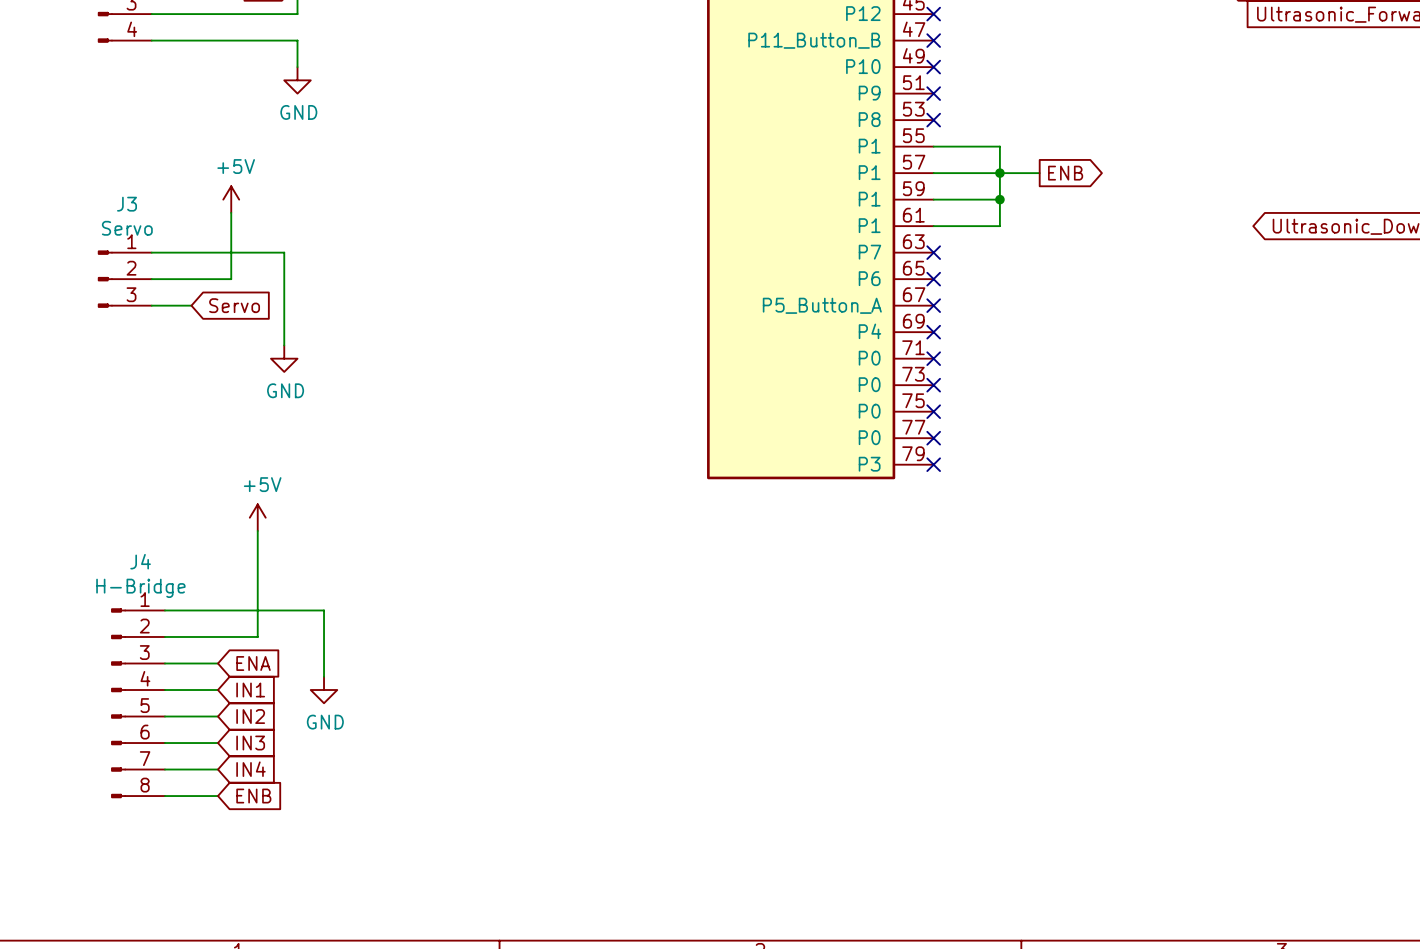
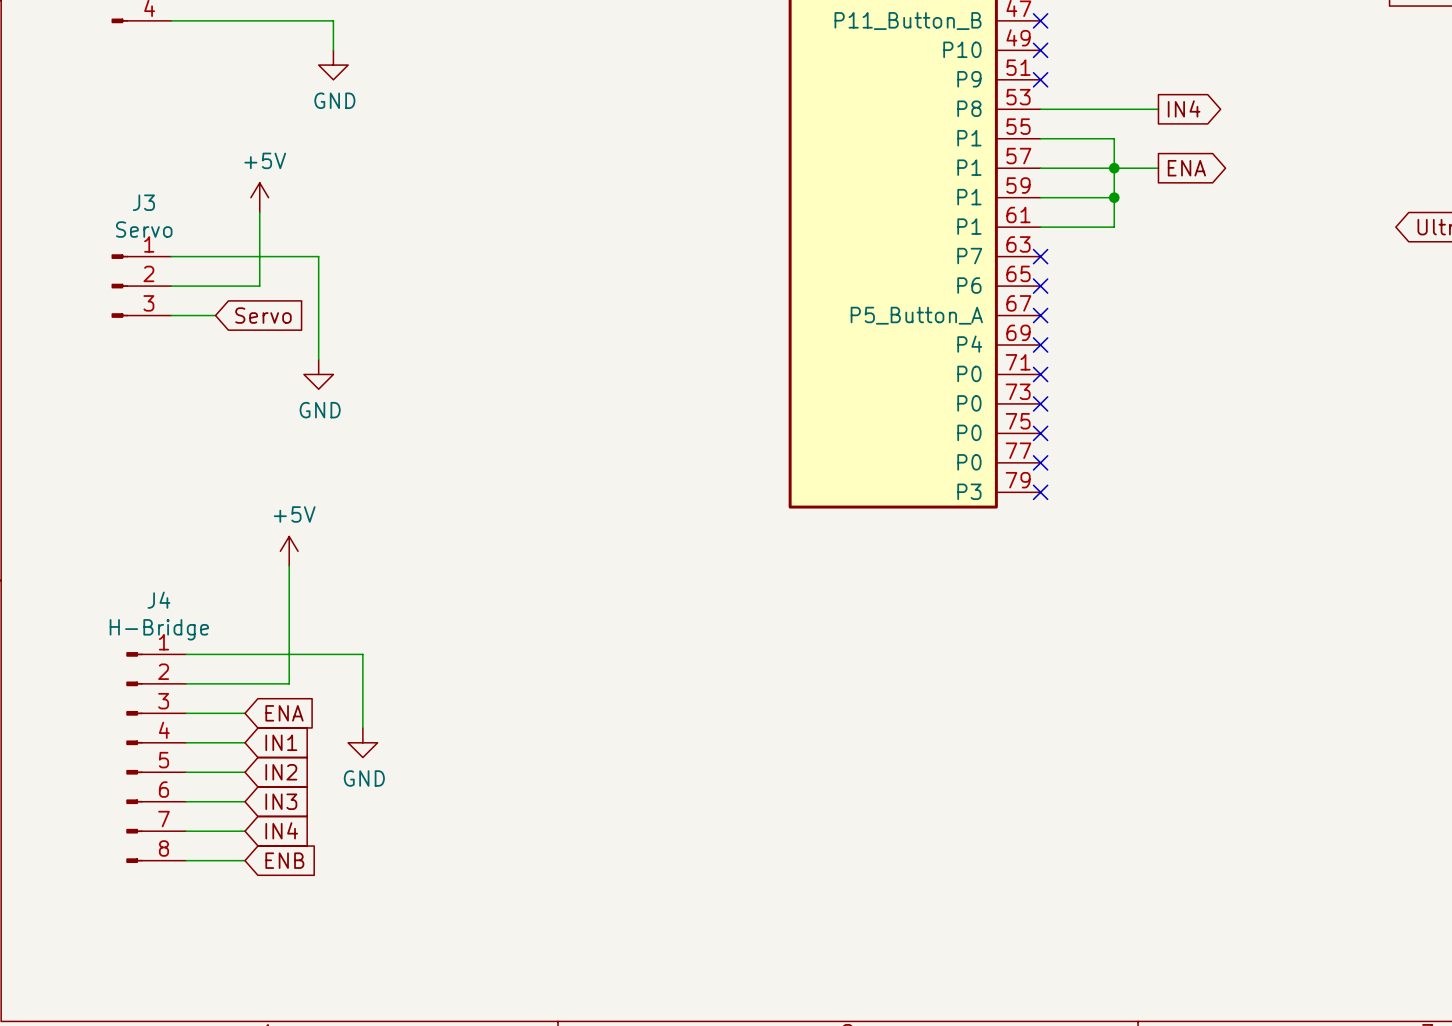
global label: none -> IN4 (1184, 108)
wire: none -> (1040, 109) (1158, 109)
no-connect mark: (933, 120) -> none
global label: ENB (1065, 173) -> ENA (1186, 168)

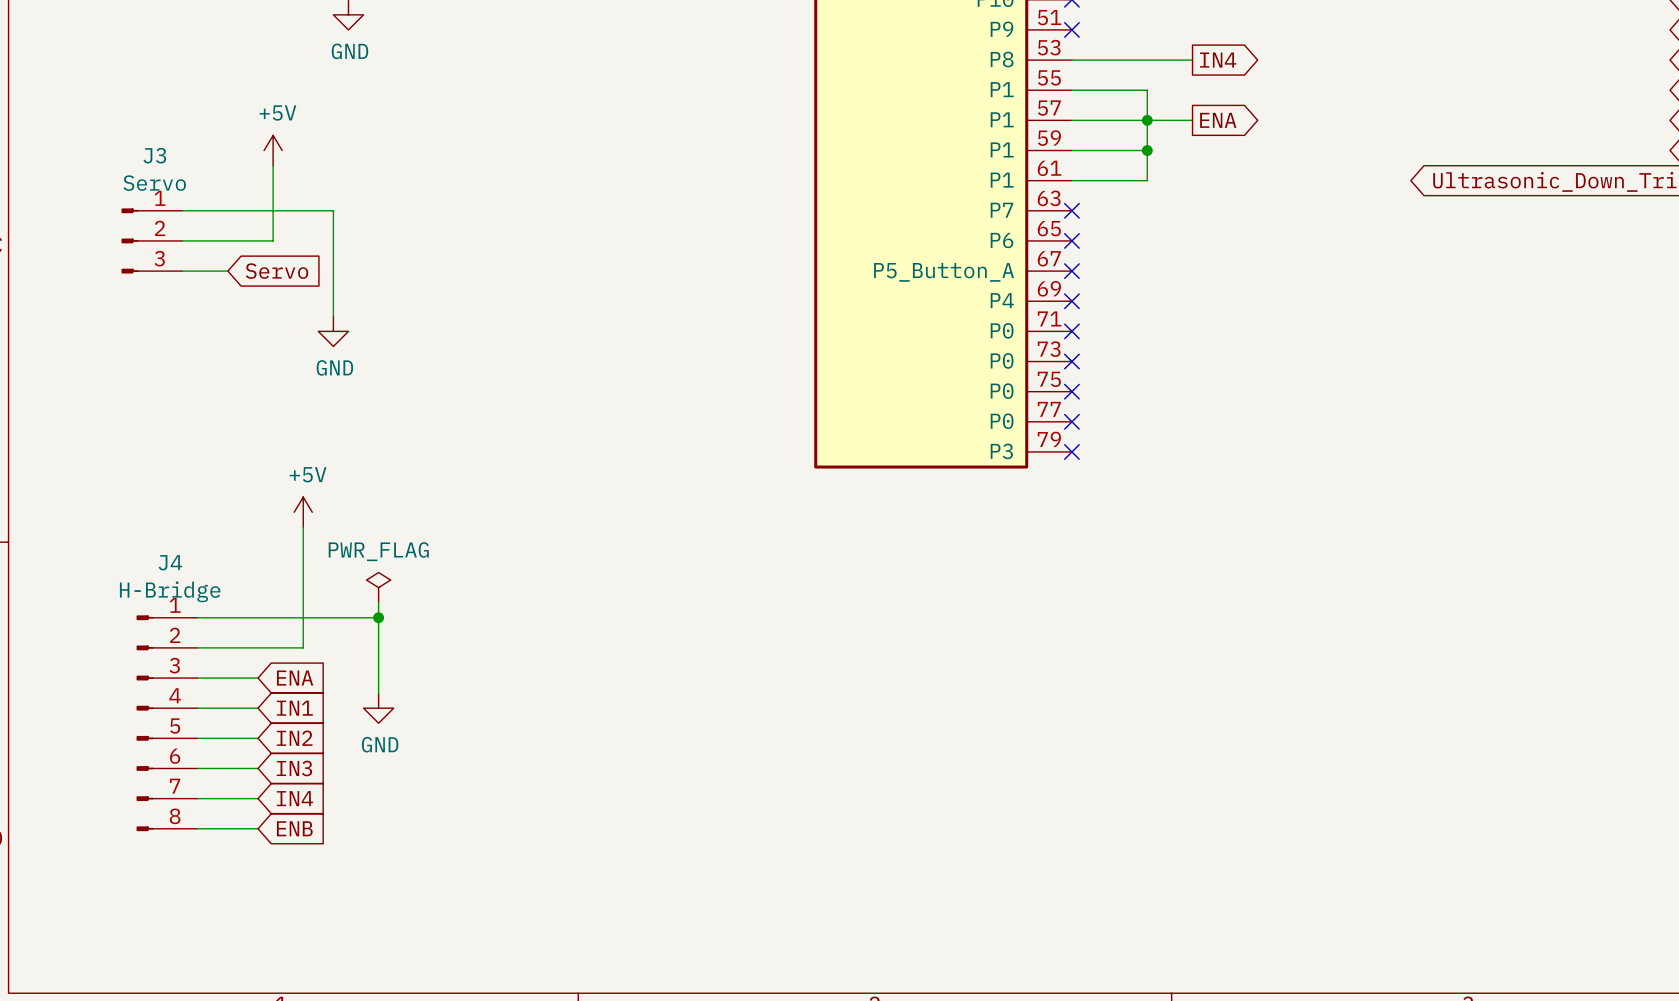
power symbol: none -> PWR_FLAG (378, 587)
wire: none -> (378, 602) (378, 617)
junction: none -> (378, 617)

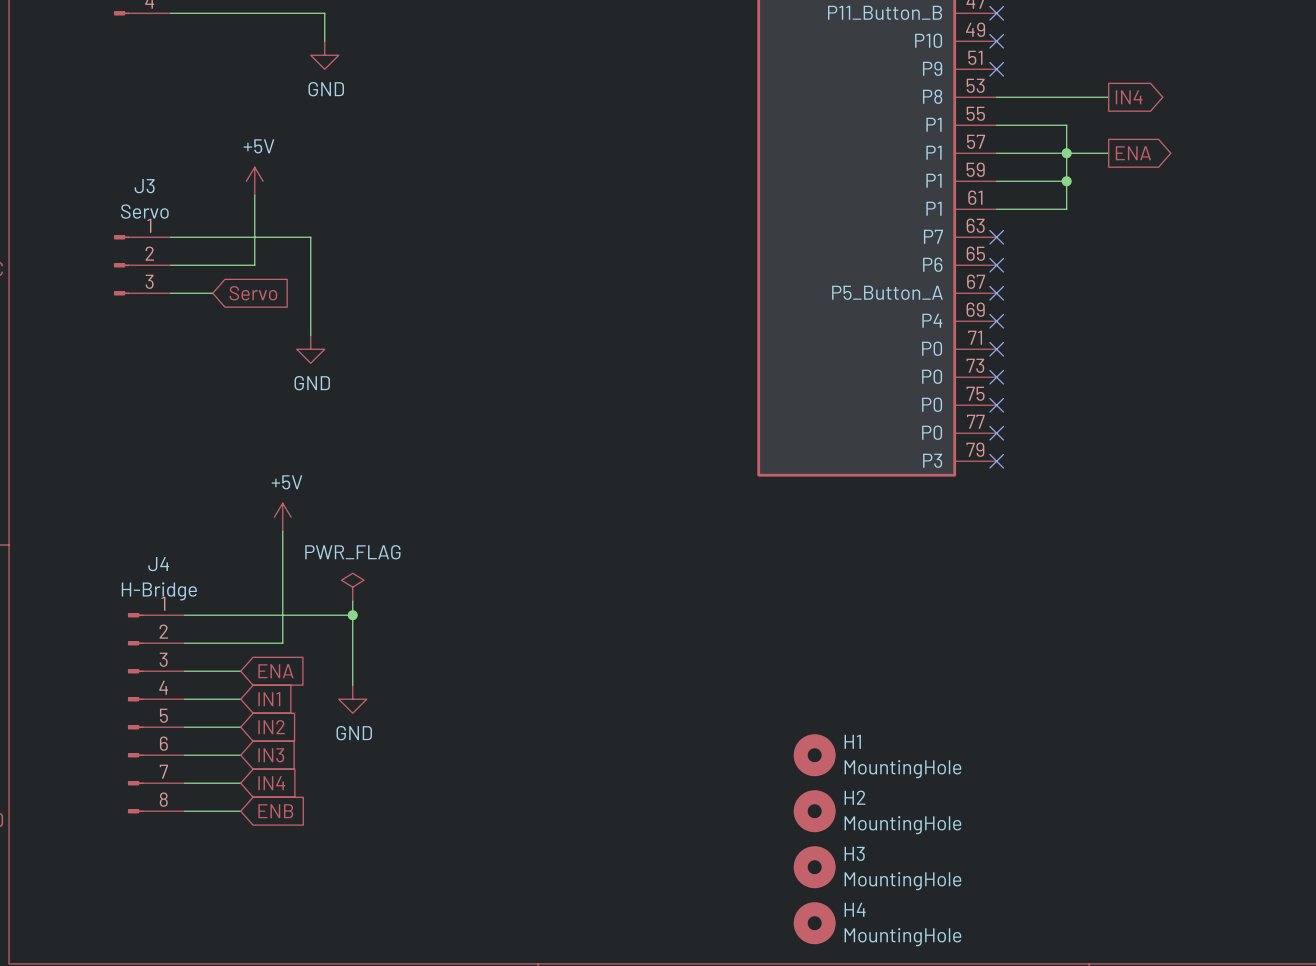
H1: none -> MountingHole (814, 755)
H2: none -> MountingHole (814, 811)
H3: none -> MountingHole (814, 867)
H4: none -> MountingHole (814, 923)

